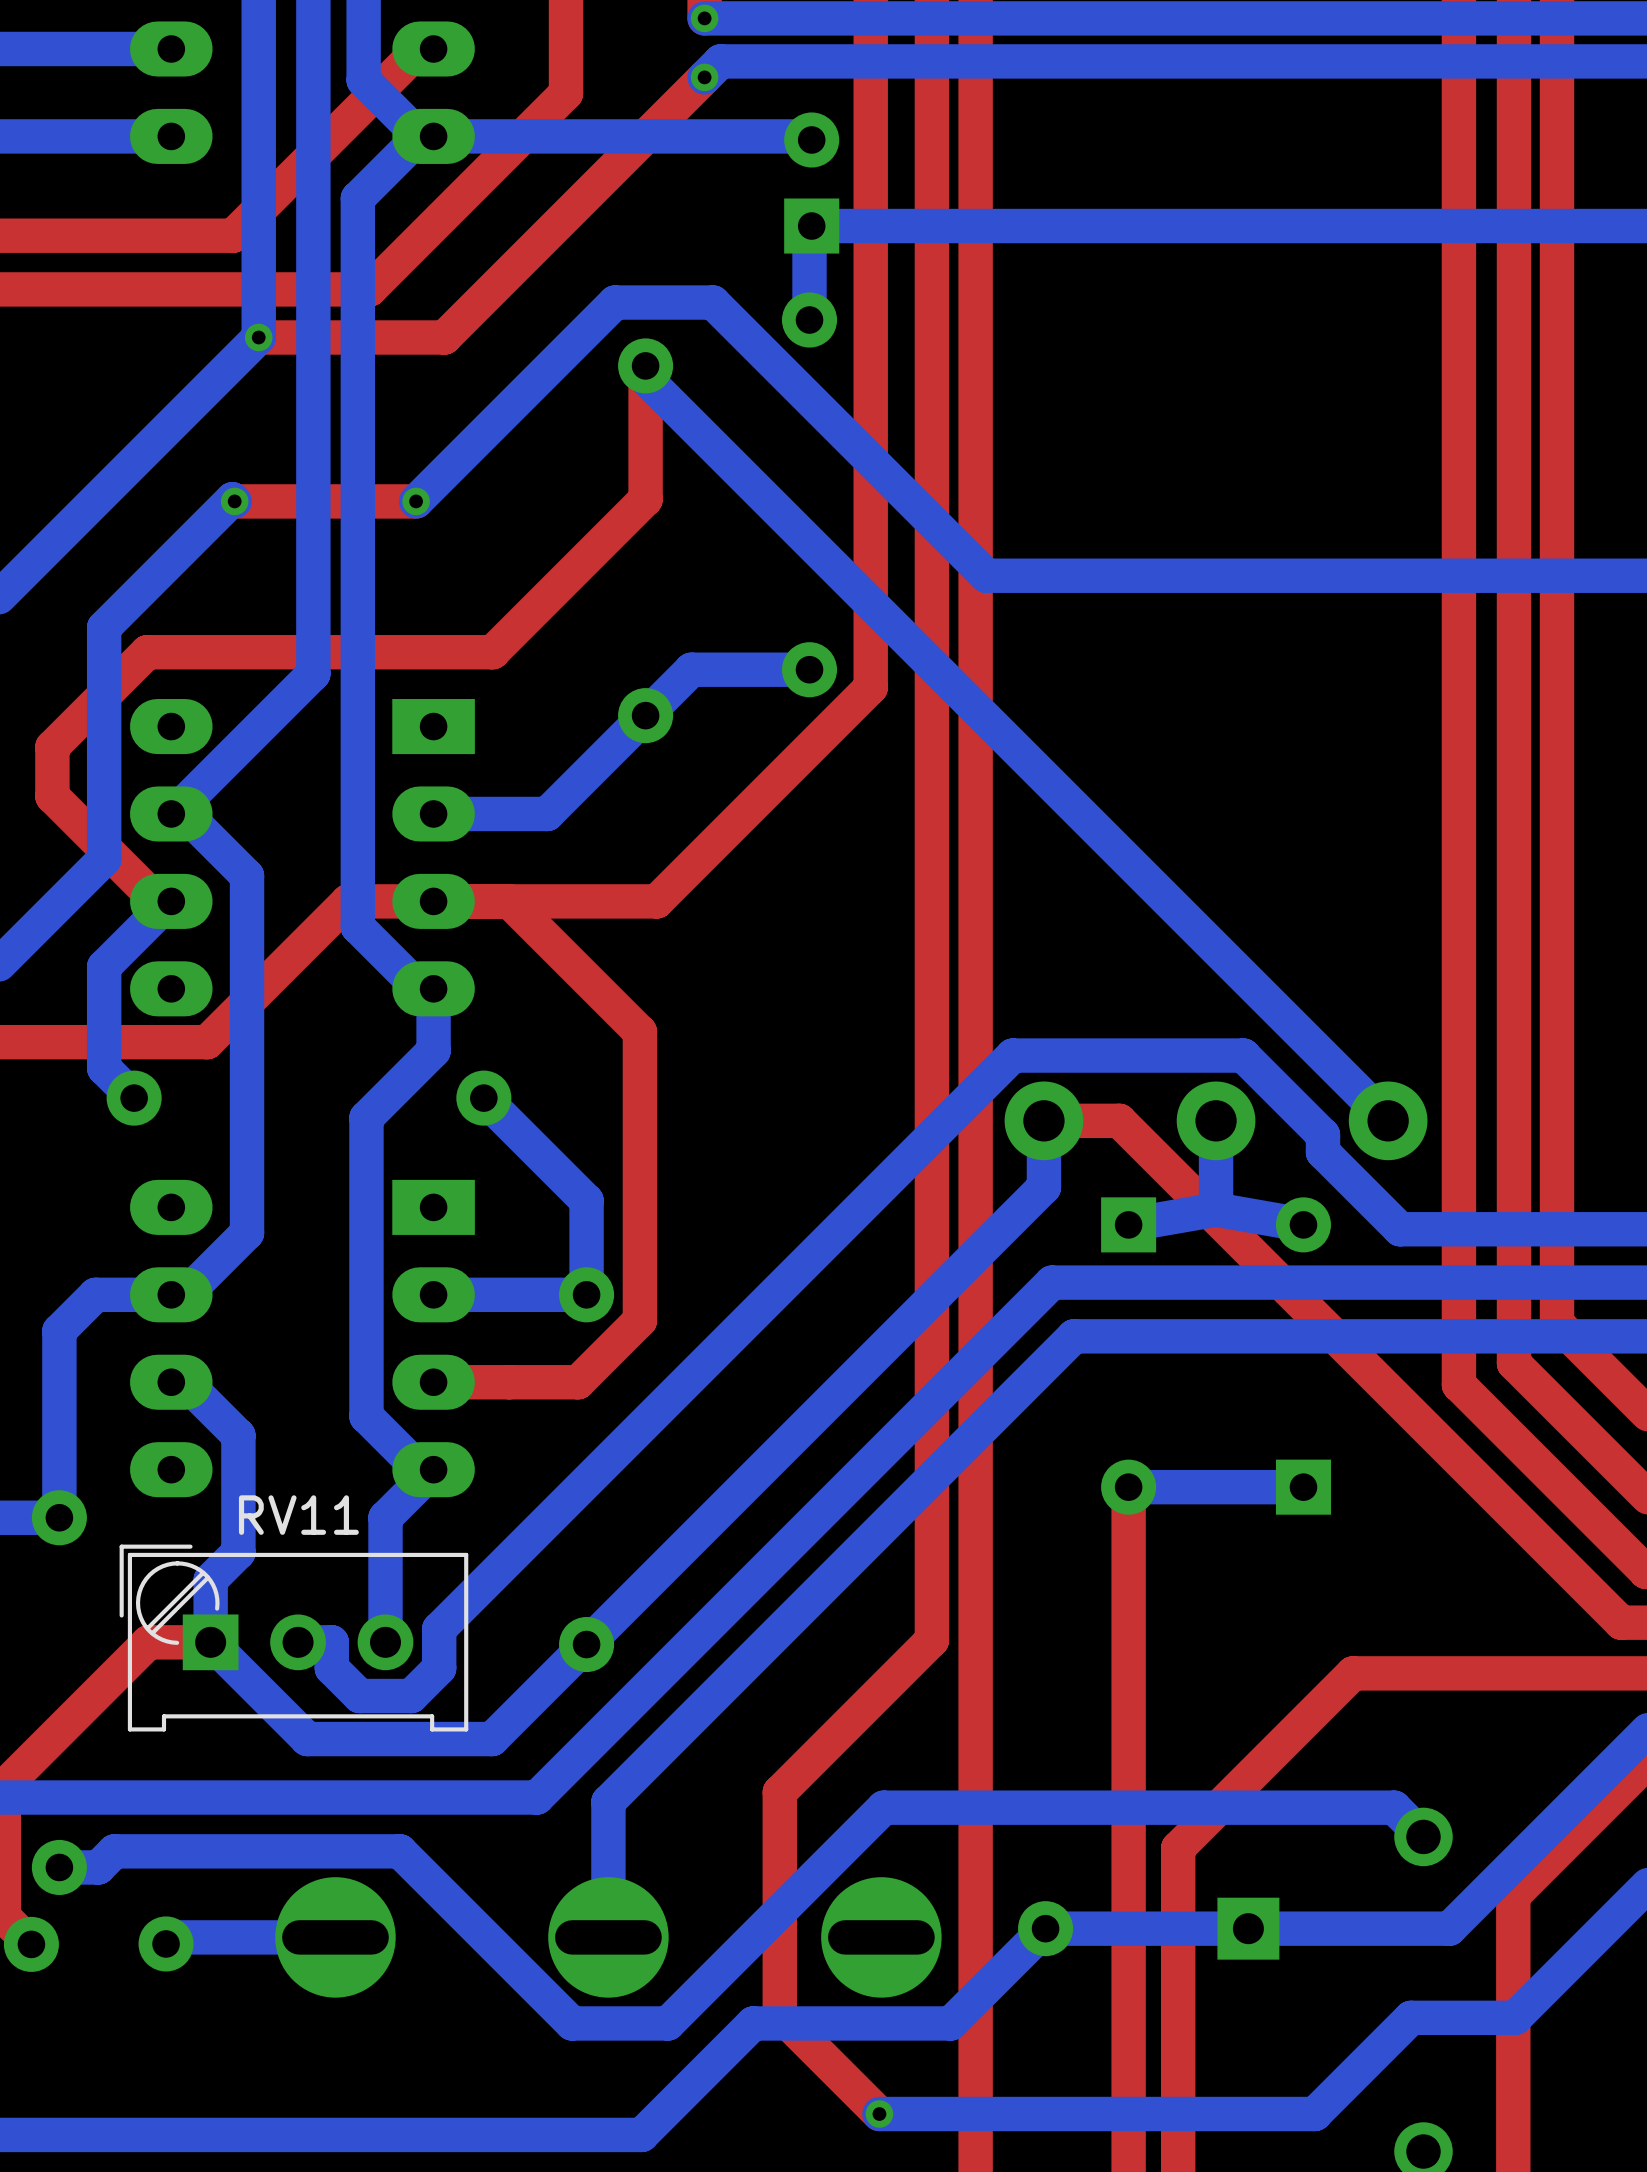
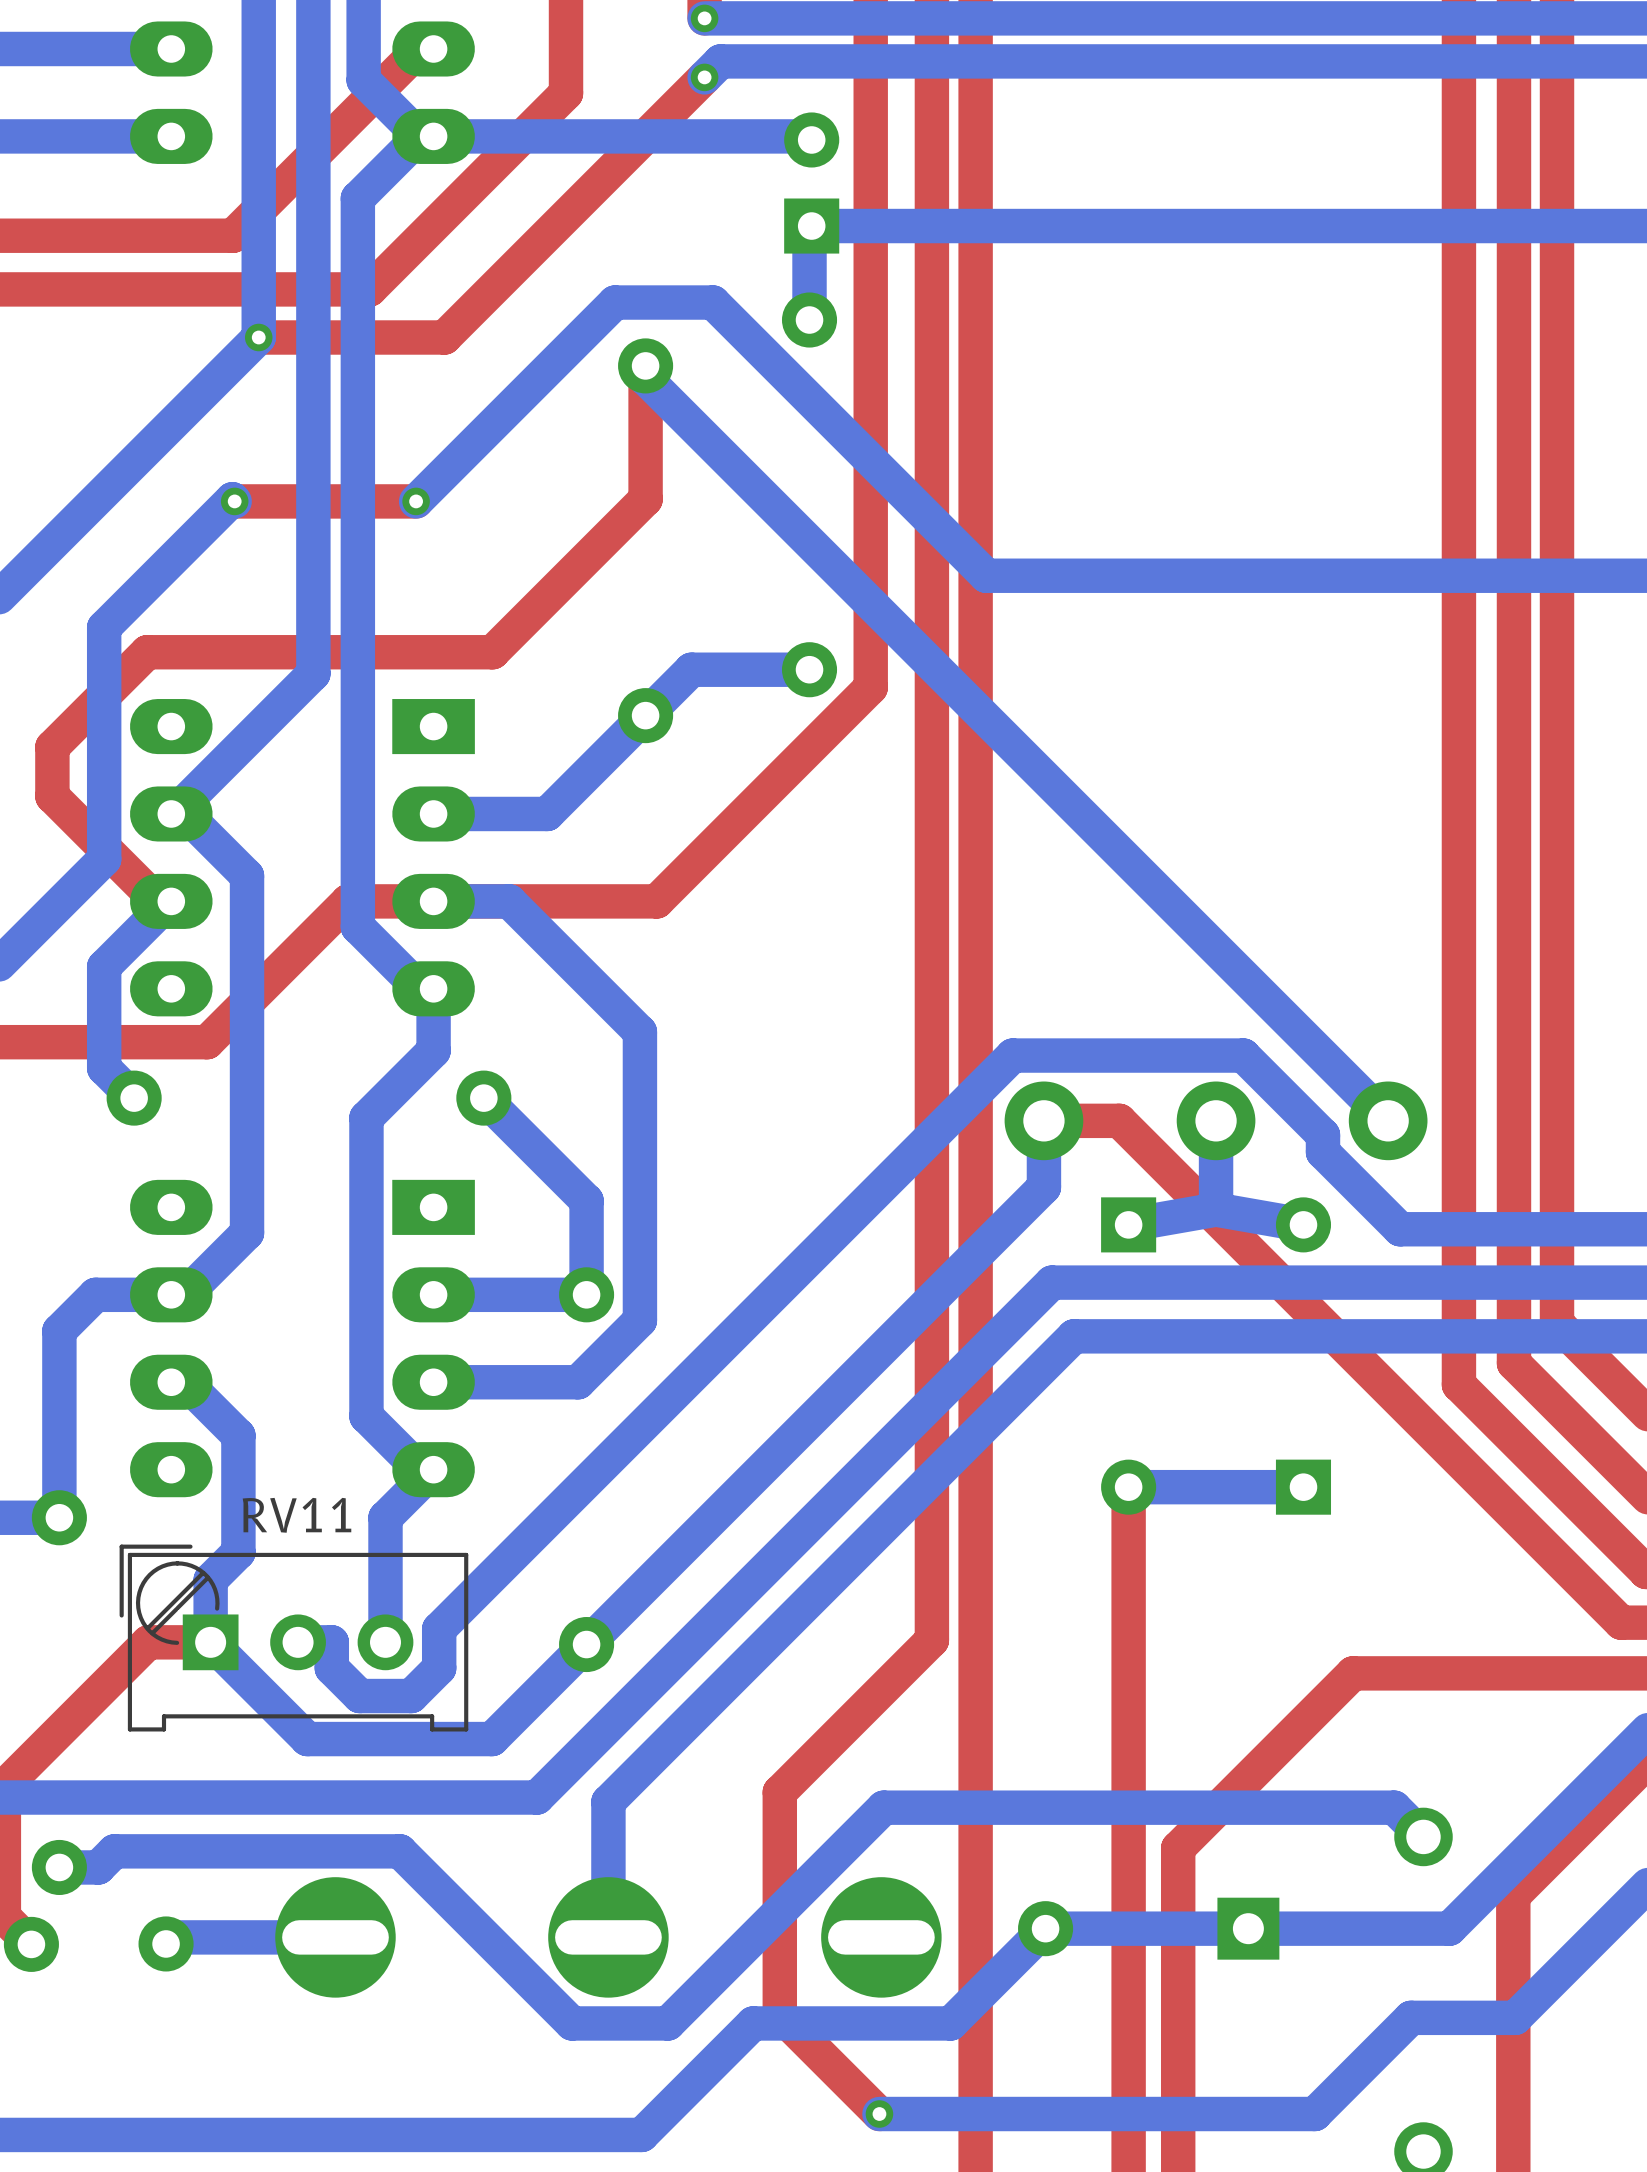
bottom track: none -> (433, 901) (509, 901) (639, 1032) (639, 1320) (578, 1382) (433, 1382)
top track: (509, 901) (639, 1032) (639, 1320) (578, 1382) (433, 1382) -> none

